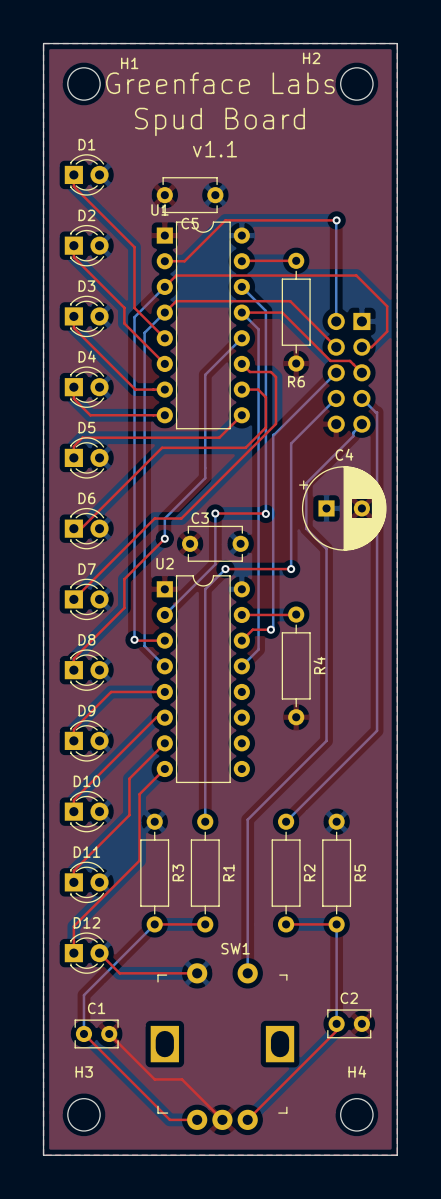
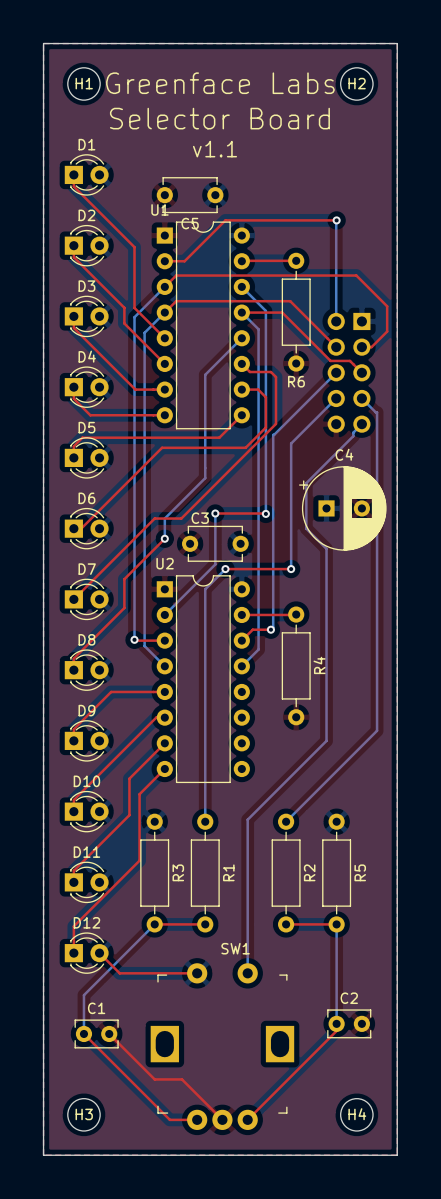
H2 name position: H2 (311, 58) -> H2 (357, 83)
H1 name position: H1 (129, 63) -> H1 (84, 83)
text: Spud Board (219, 121) -> Selector Board (219, 118)
H4 name position: H4 (357, 1071) -> H4 (357, 1114)
H3 name position: H3 (84, 1072) -> H3 (84, 1114)

